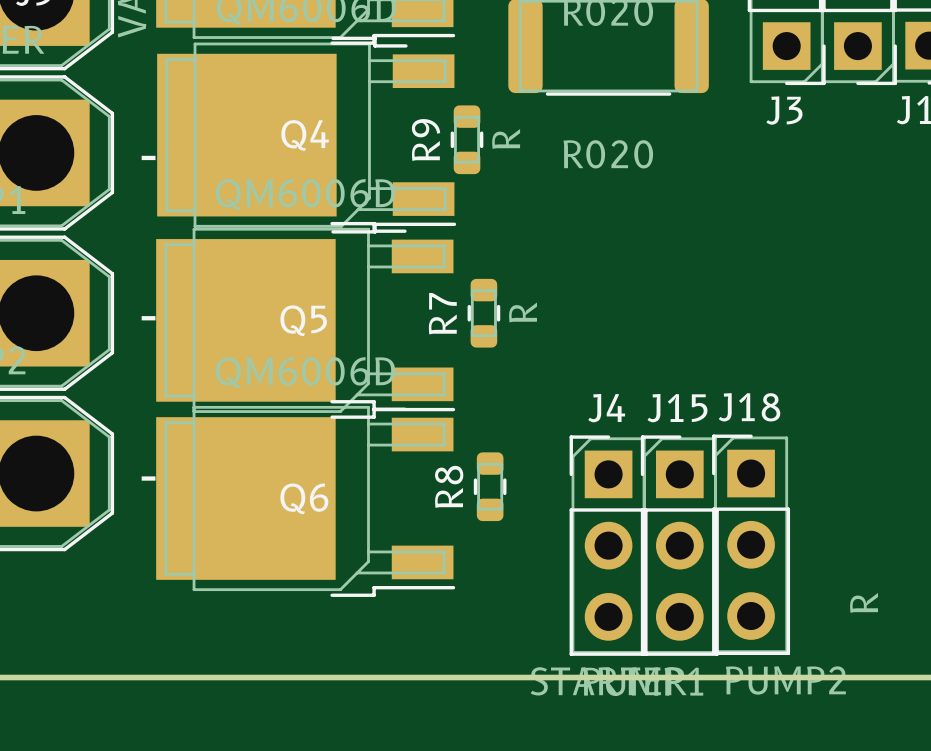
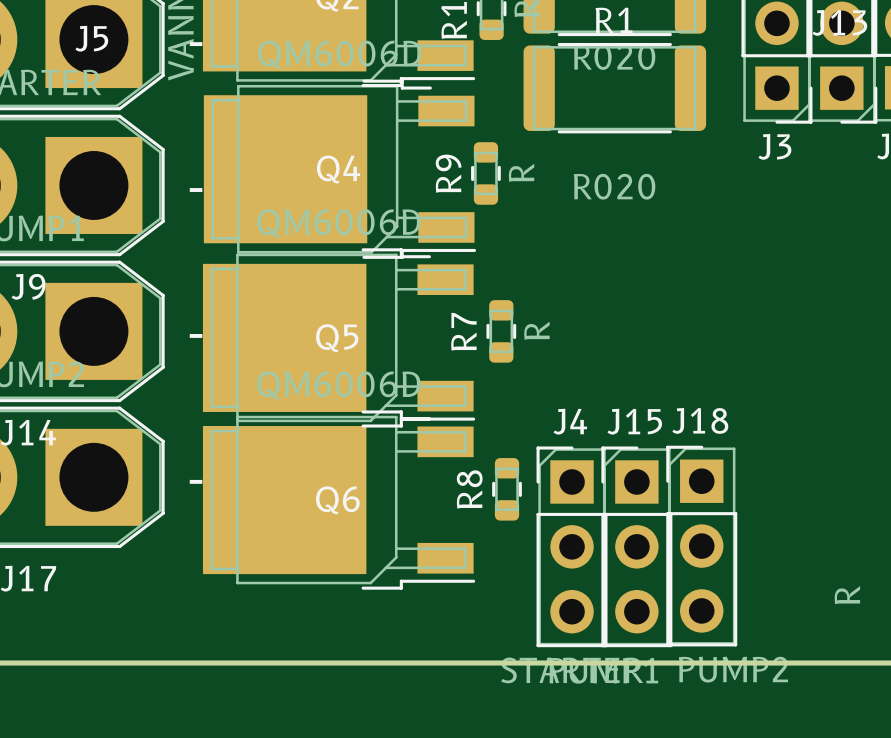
J18 position: (751, 544) -> (701, 546)
J4 position: (608, 545) -> (572, 546)
J15 position: (679, 545) -> (636, 546)

